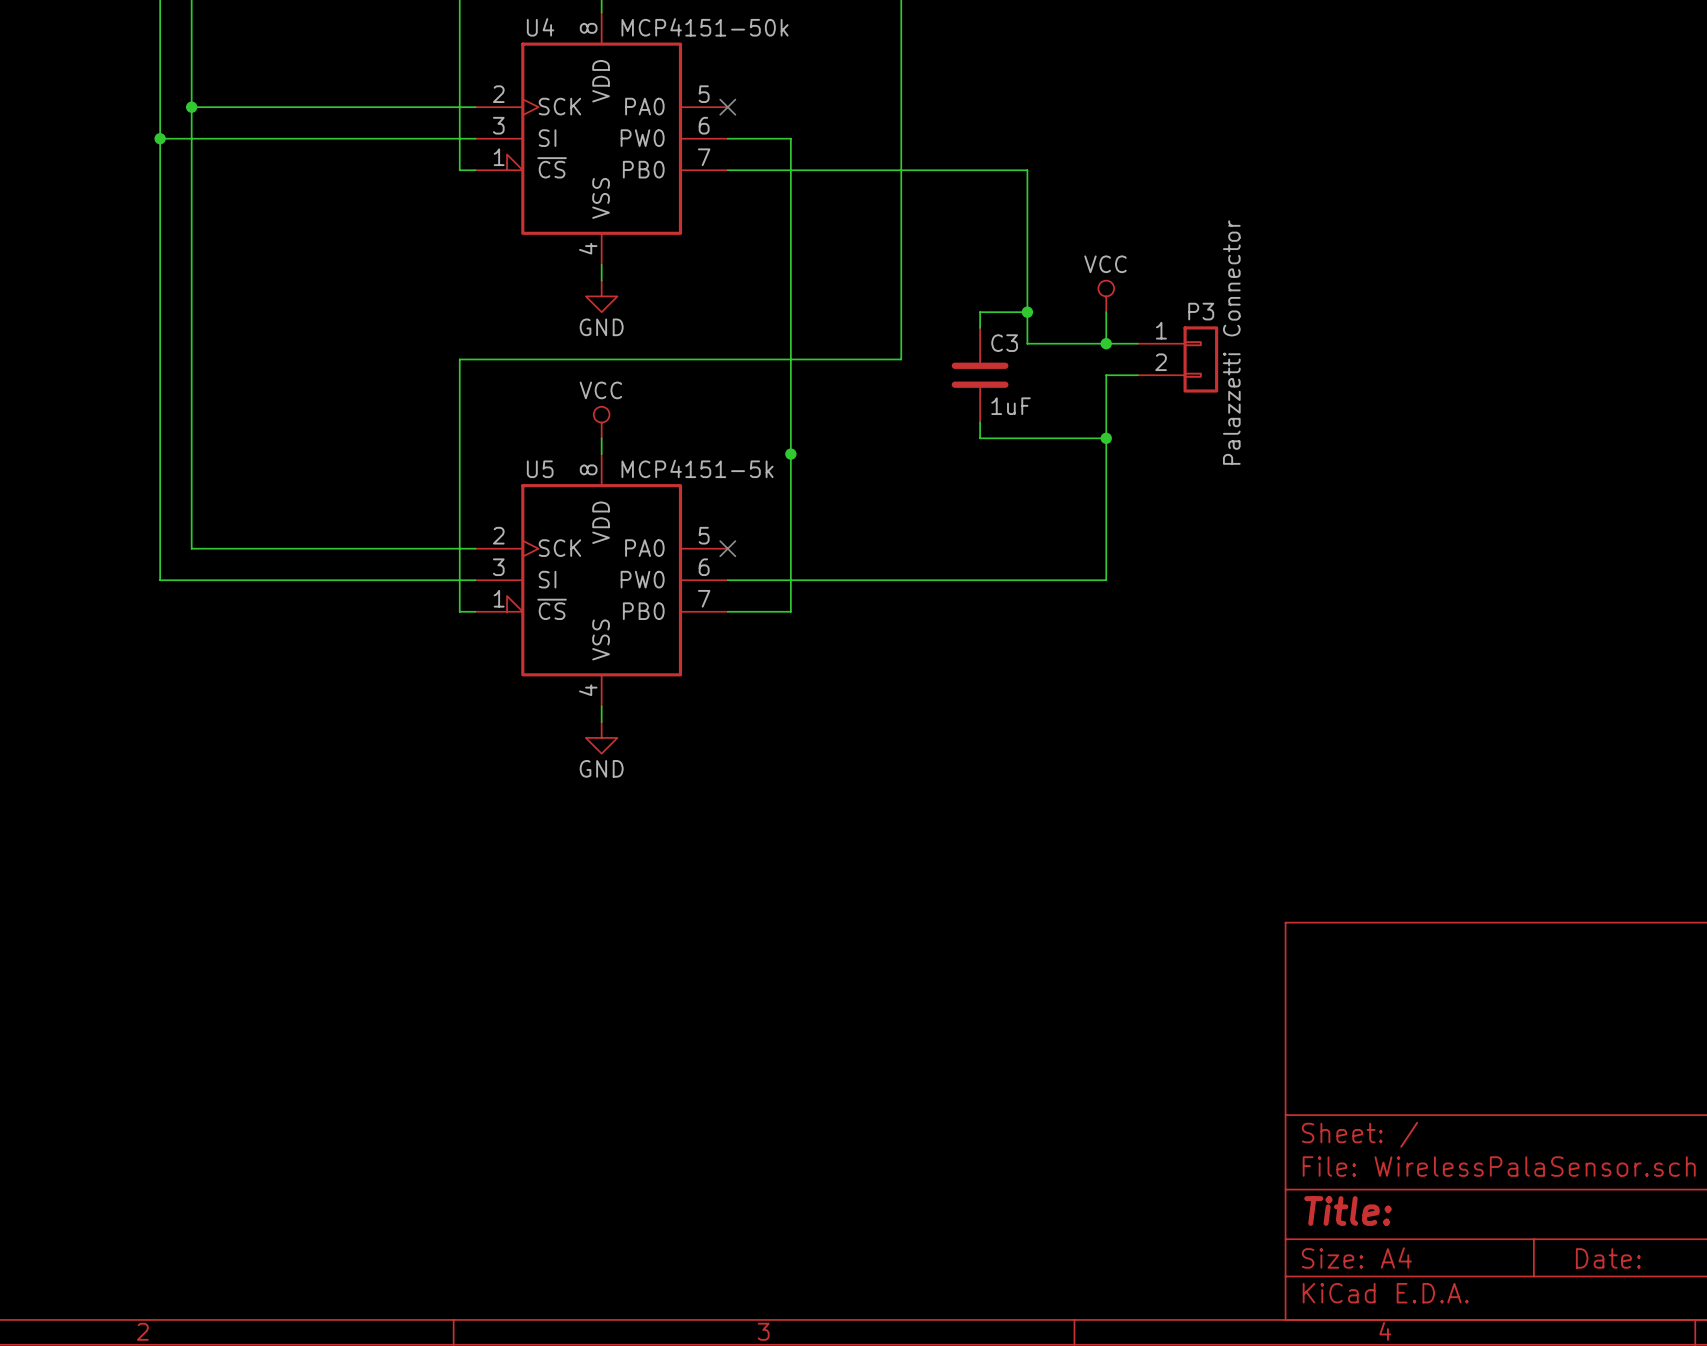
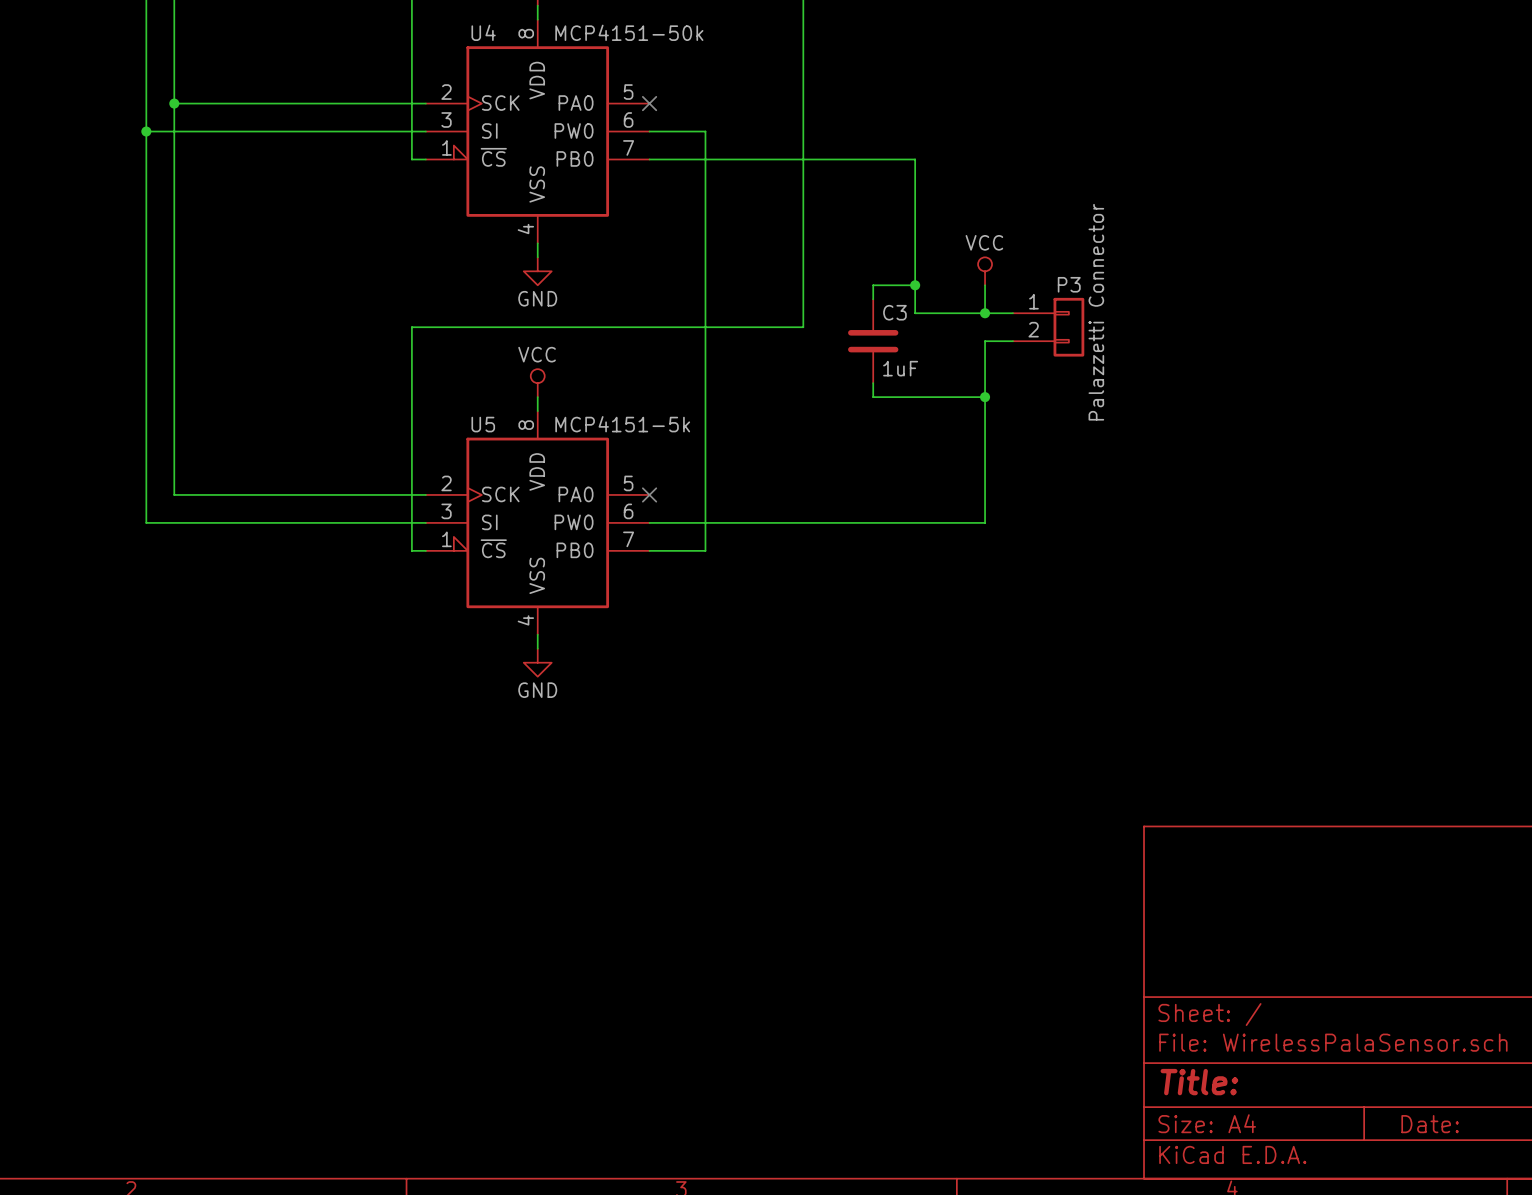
junction: (790, 454) -> none

